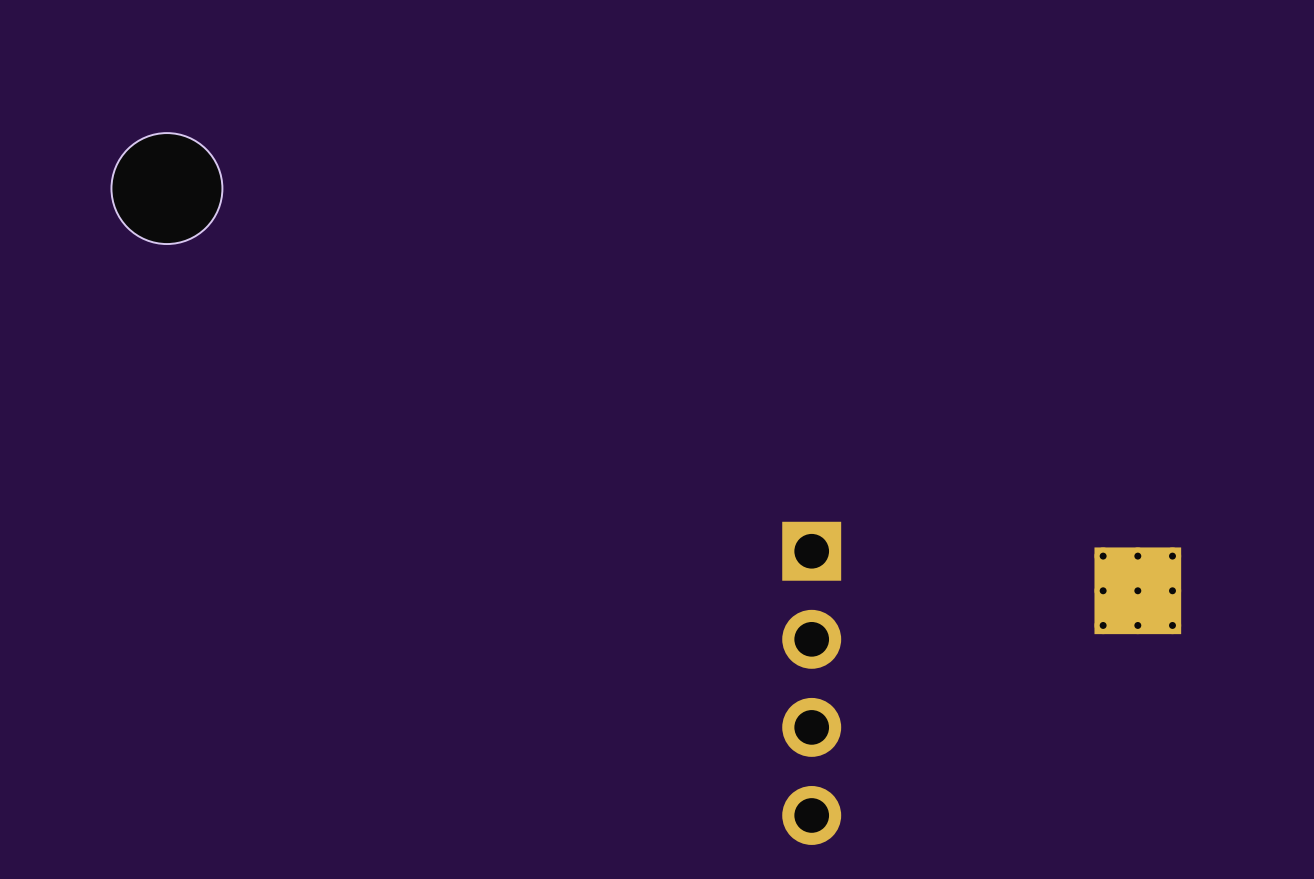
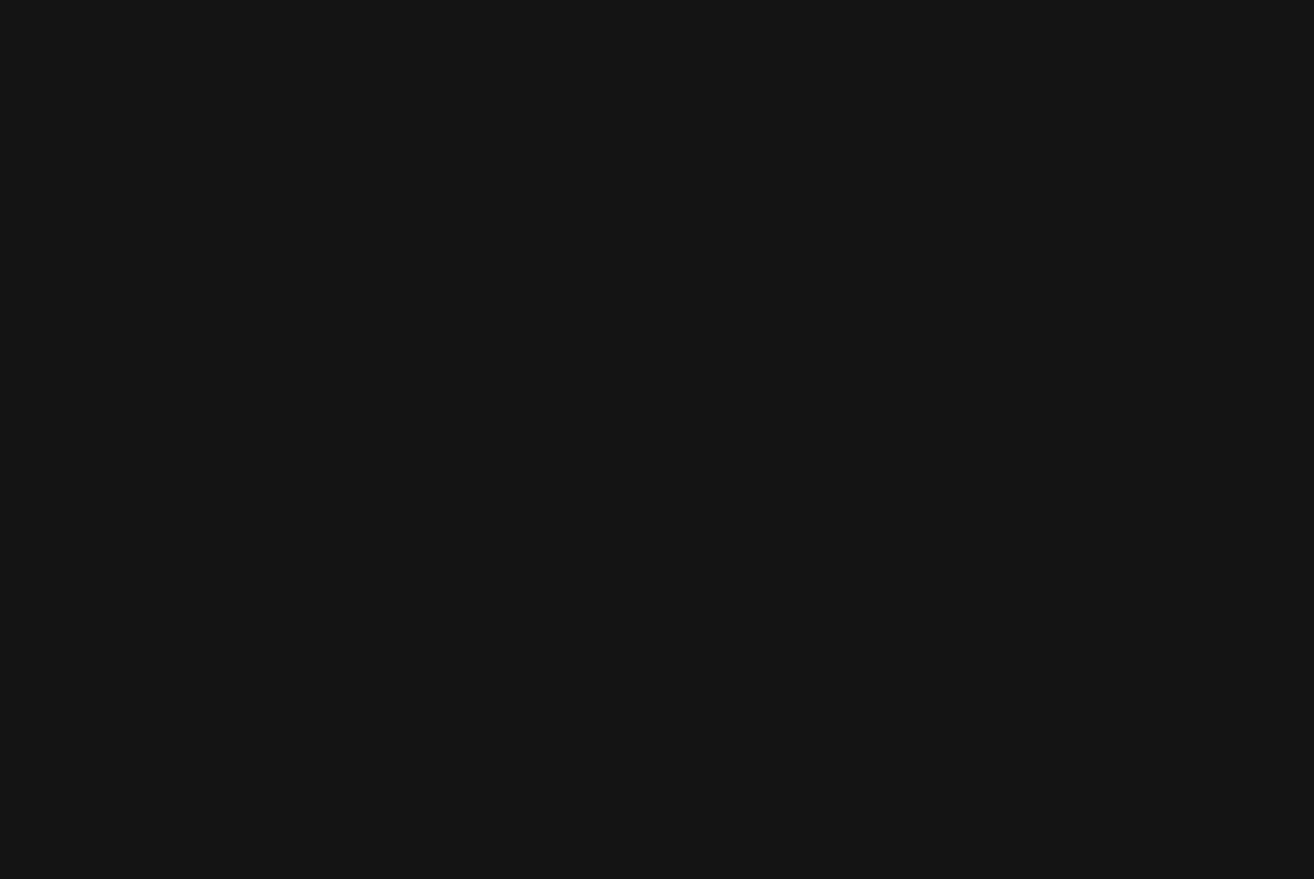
part: (166, 188) -> none
part: (1137, 590) -> none
part: (811, 683) -> none

